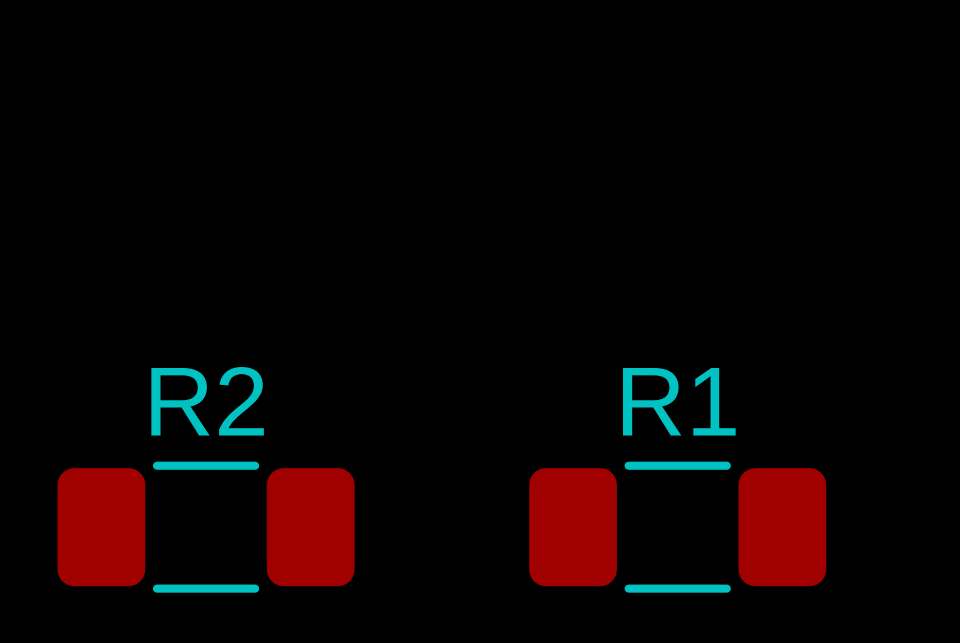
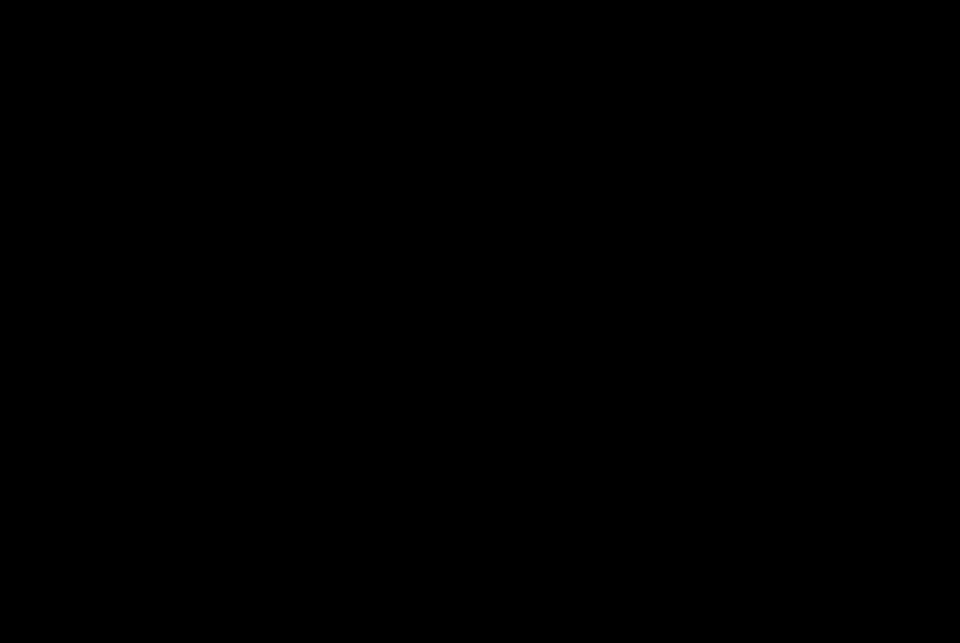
R2: (206, 527) -> none
R1: (677, 527) -> none

